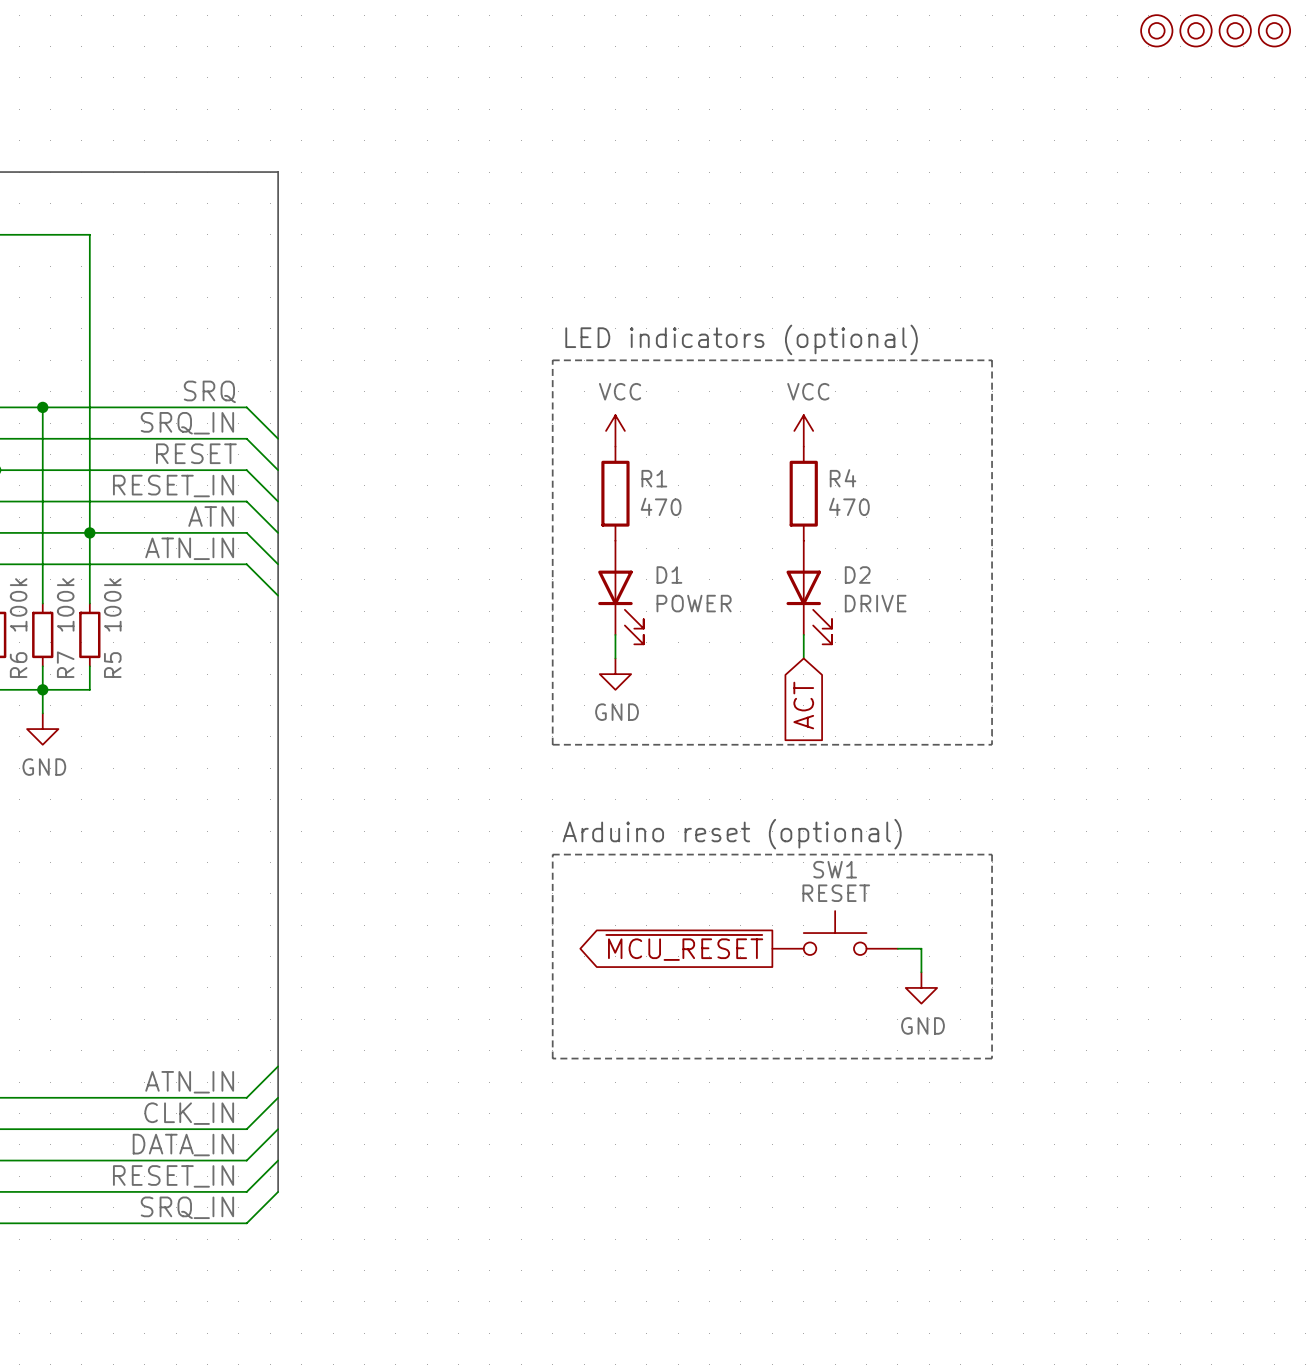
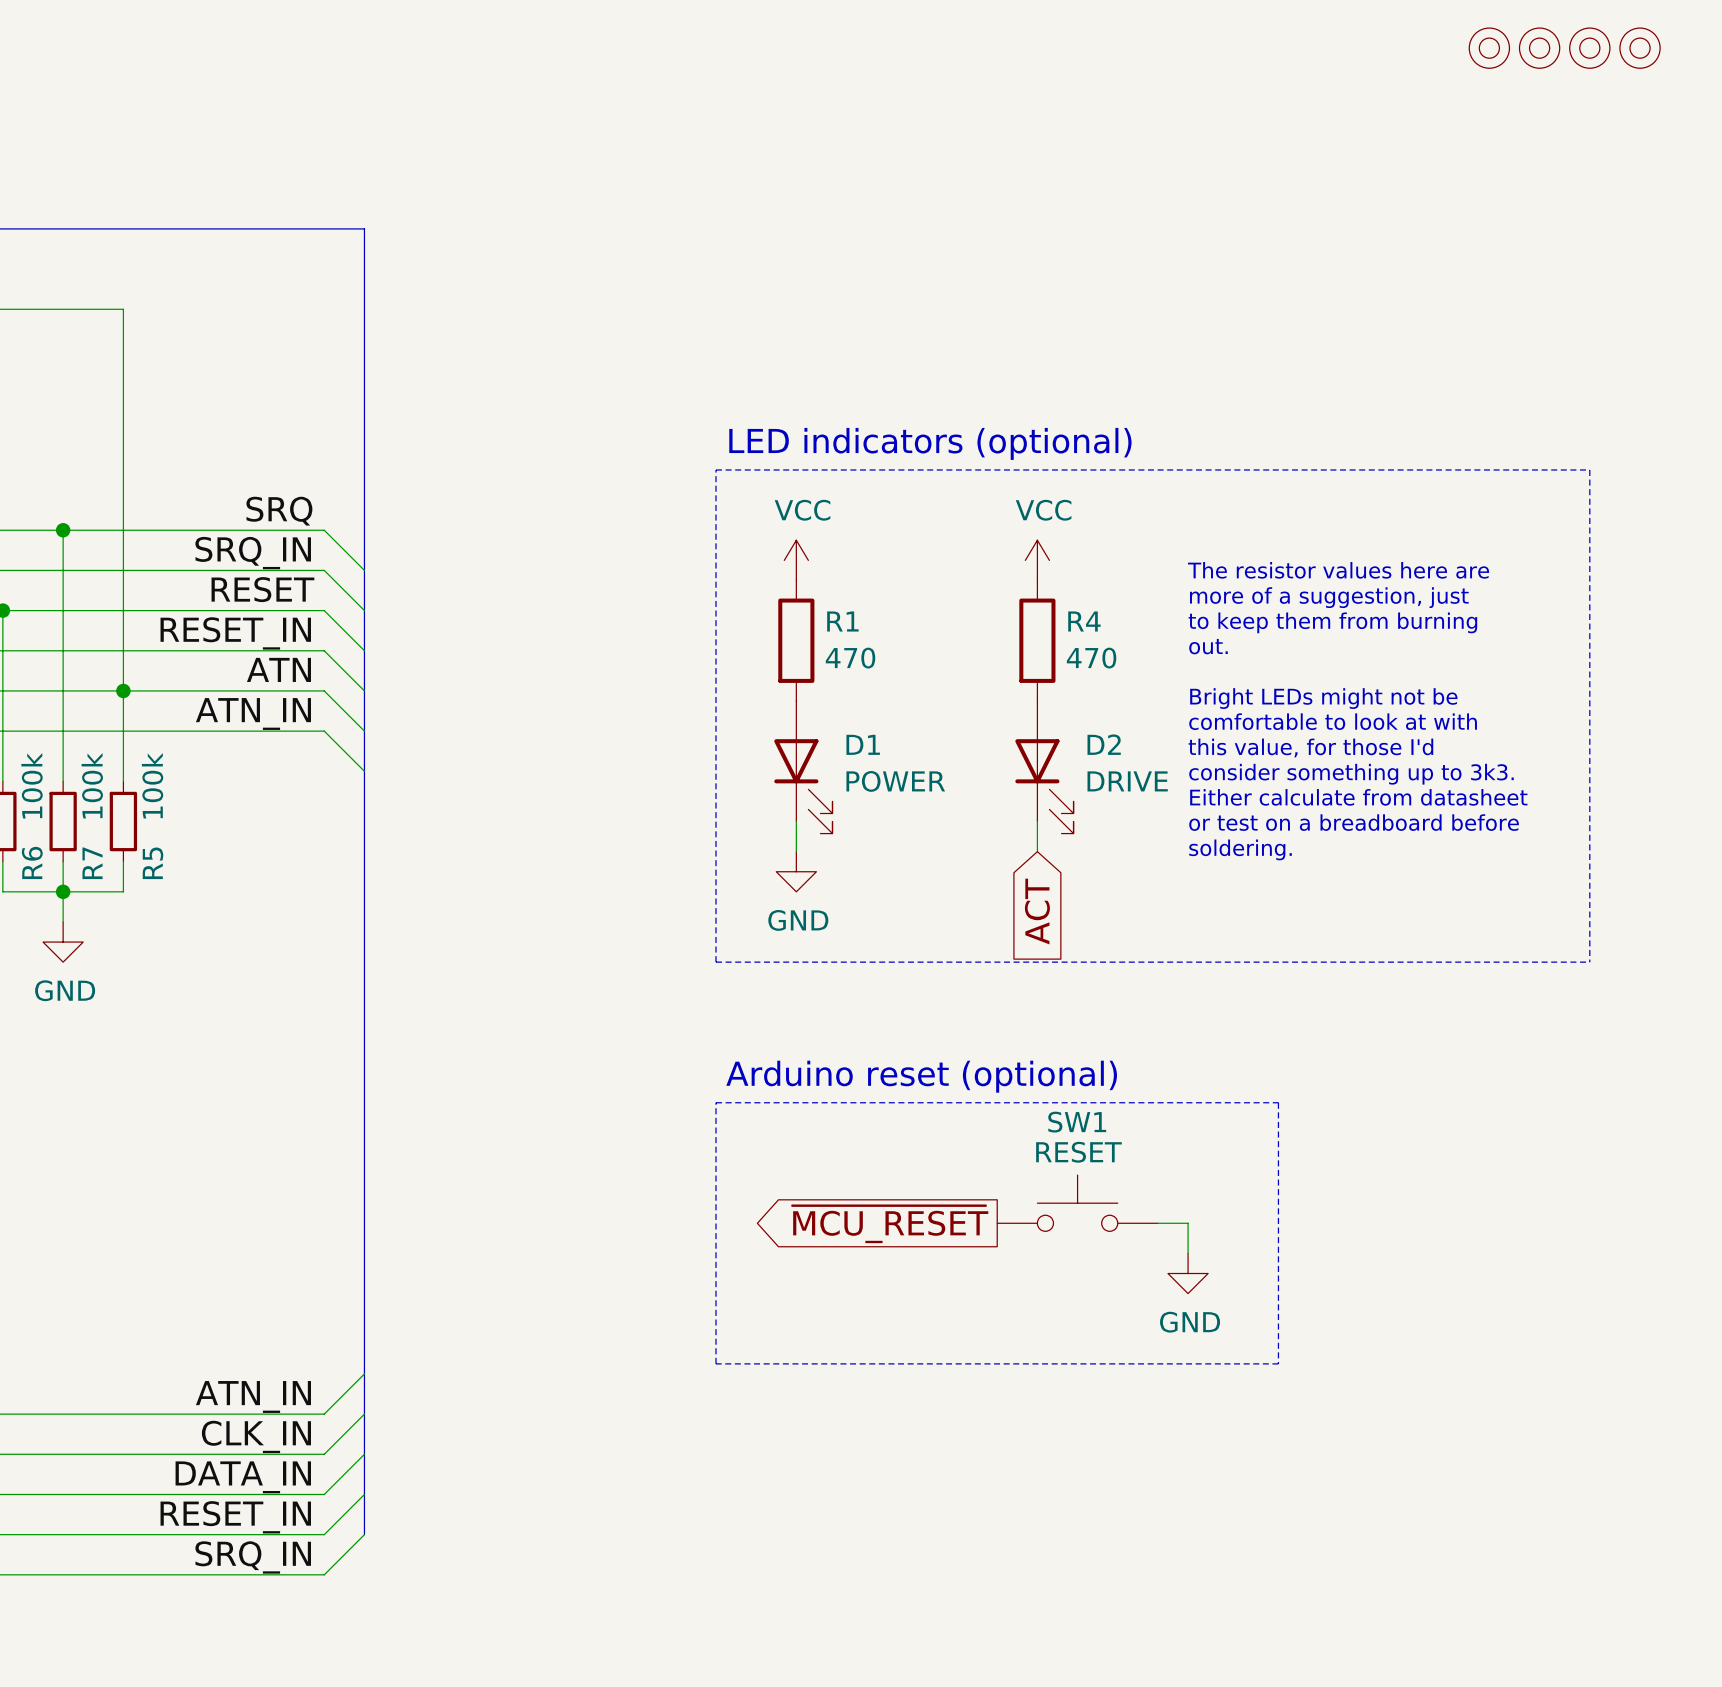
line: (992, 360) (992, 744) -> (1278, 469) (1589, 469) (1589, 962) (1278, 962)
text: none -> The resistor values here are (1338, 570)
text: none -> more of a suggestion, just (1329, 597)
text: none -> to keep them from burning (1332, 622)
text: none -> out. (1208, 646)
text: none -> Bright LEDs might not be (1323, 698)
text: none -> comfortable to look at with (1333, 721)
text: none -> this value, for those I'd (1310, 748)
text: none -> consider something up to 3k3. (1351, 774)
text: none -> Either calculate from datasheet (1358, 797)
text: none -> or test on a breadboard before (1354, 822)
text: none -> soldering. (1240, 849)

